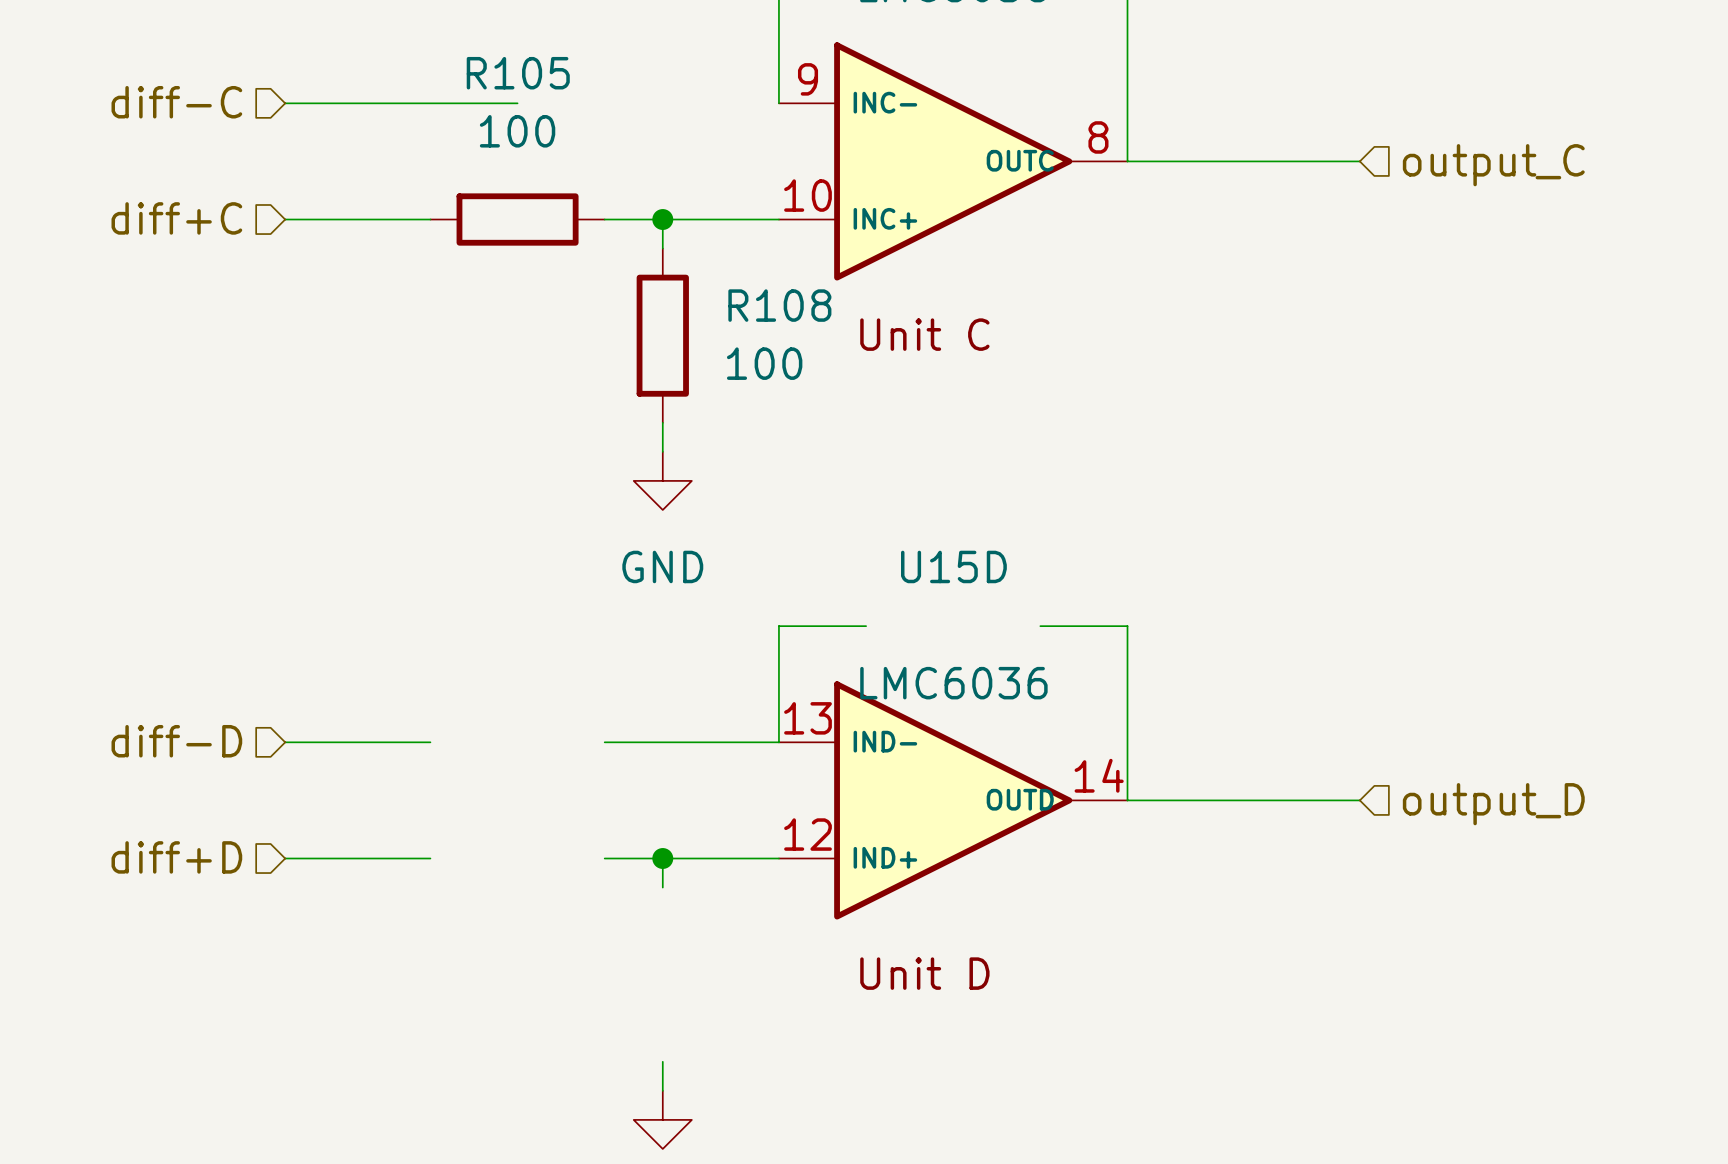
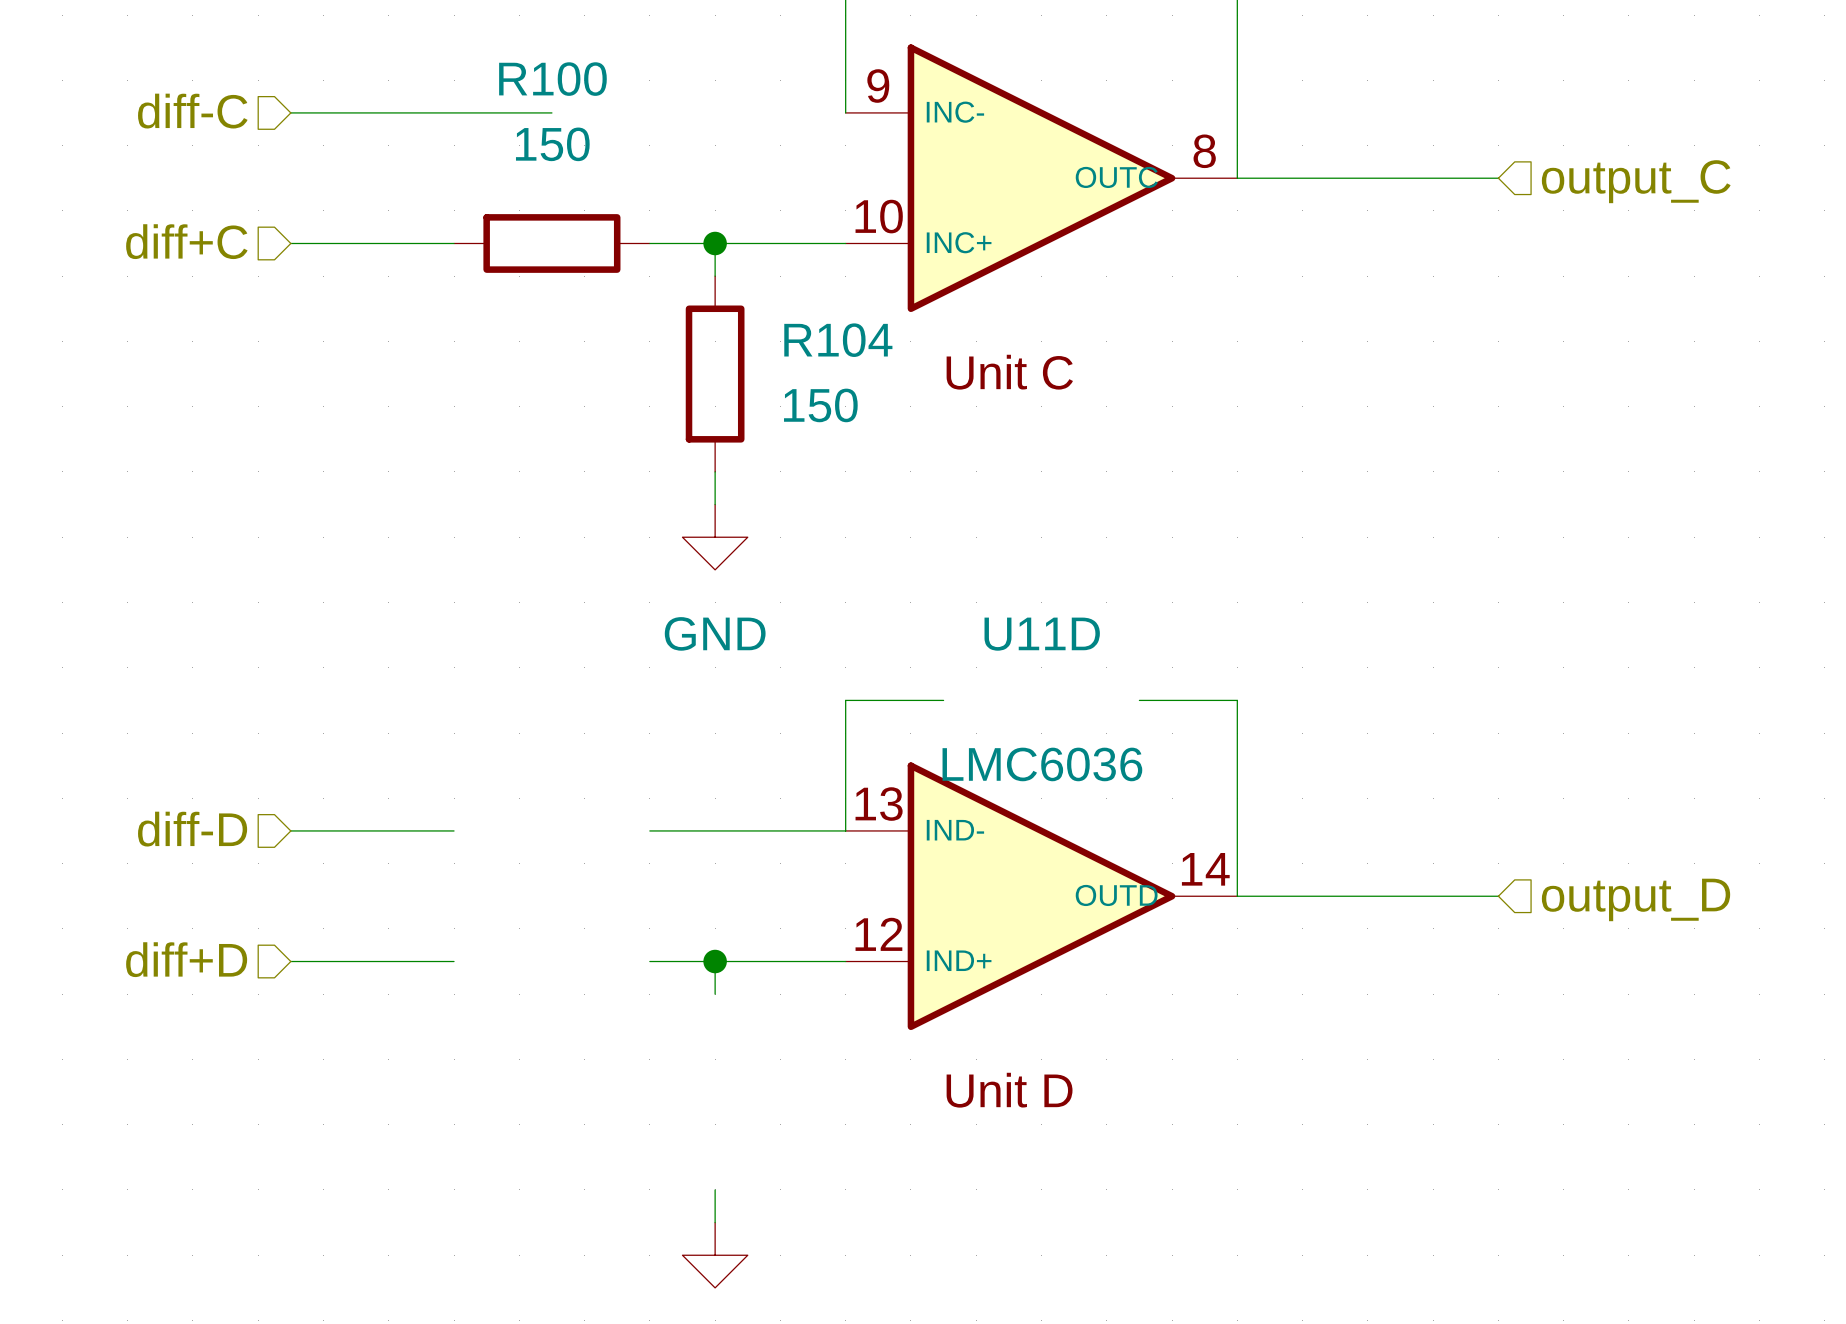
R105 name: R105 (518, 73) -> R100 (552, 79)
R105 value: 100 (517, 131) -> 150 (552, 144)
R108 name: R108 (779, 305) -> R104 (838, 340)
R108 value: 100 (764, 363) -> 150 (820, 405)
U15D name: U15D (953, 566) -> U11D (1042, 634)

